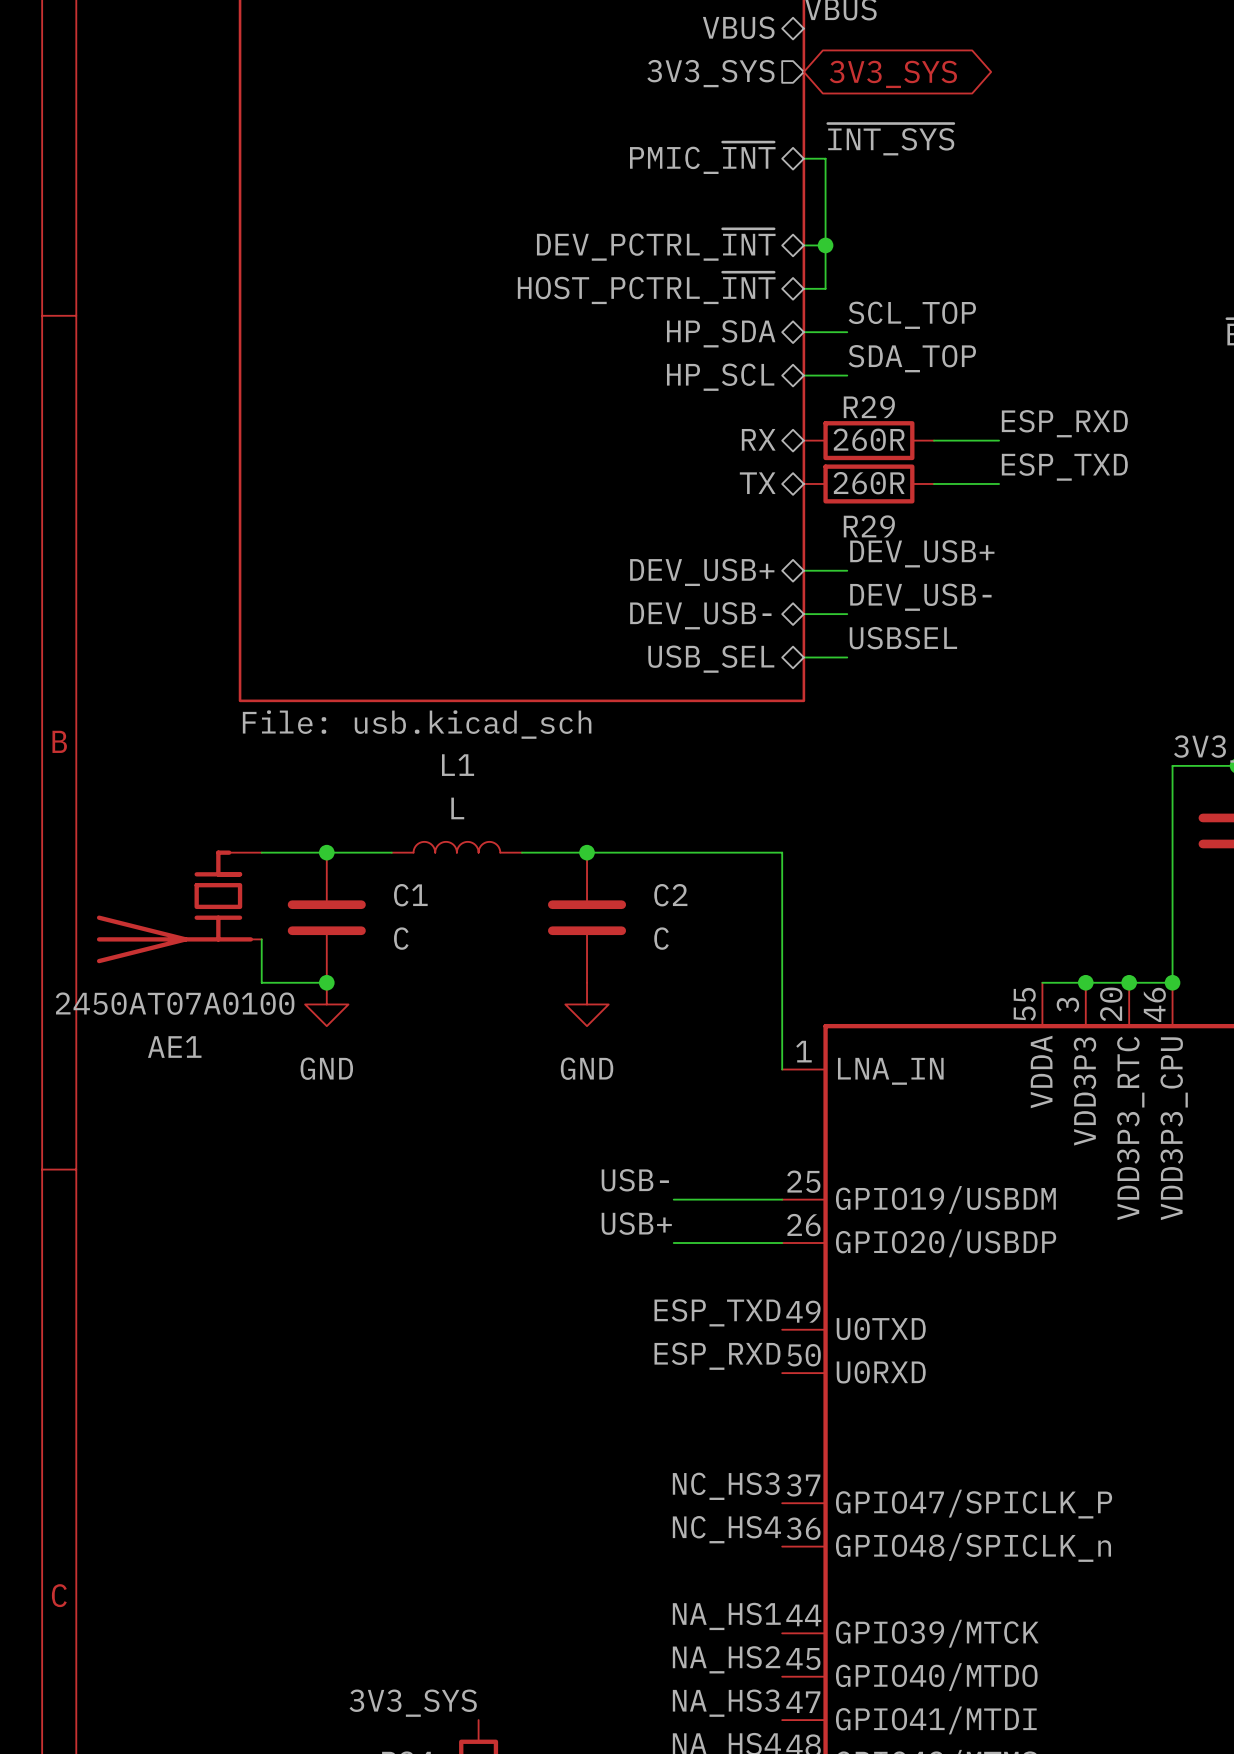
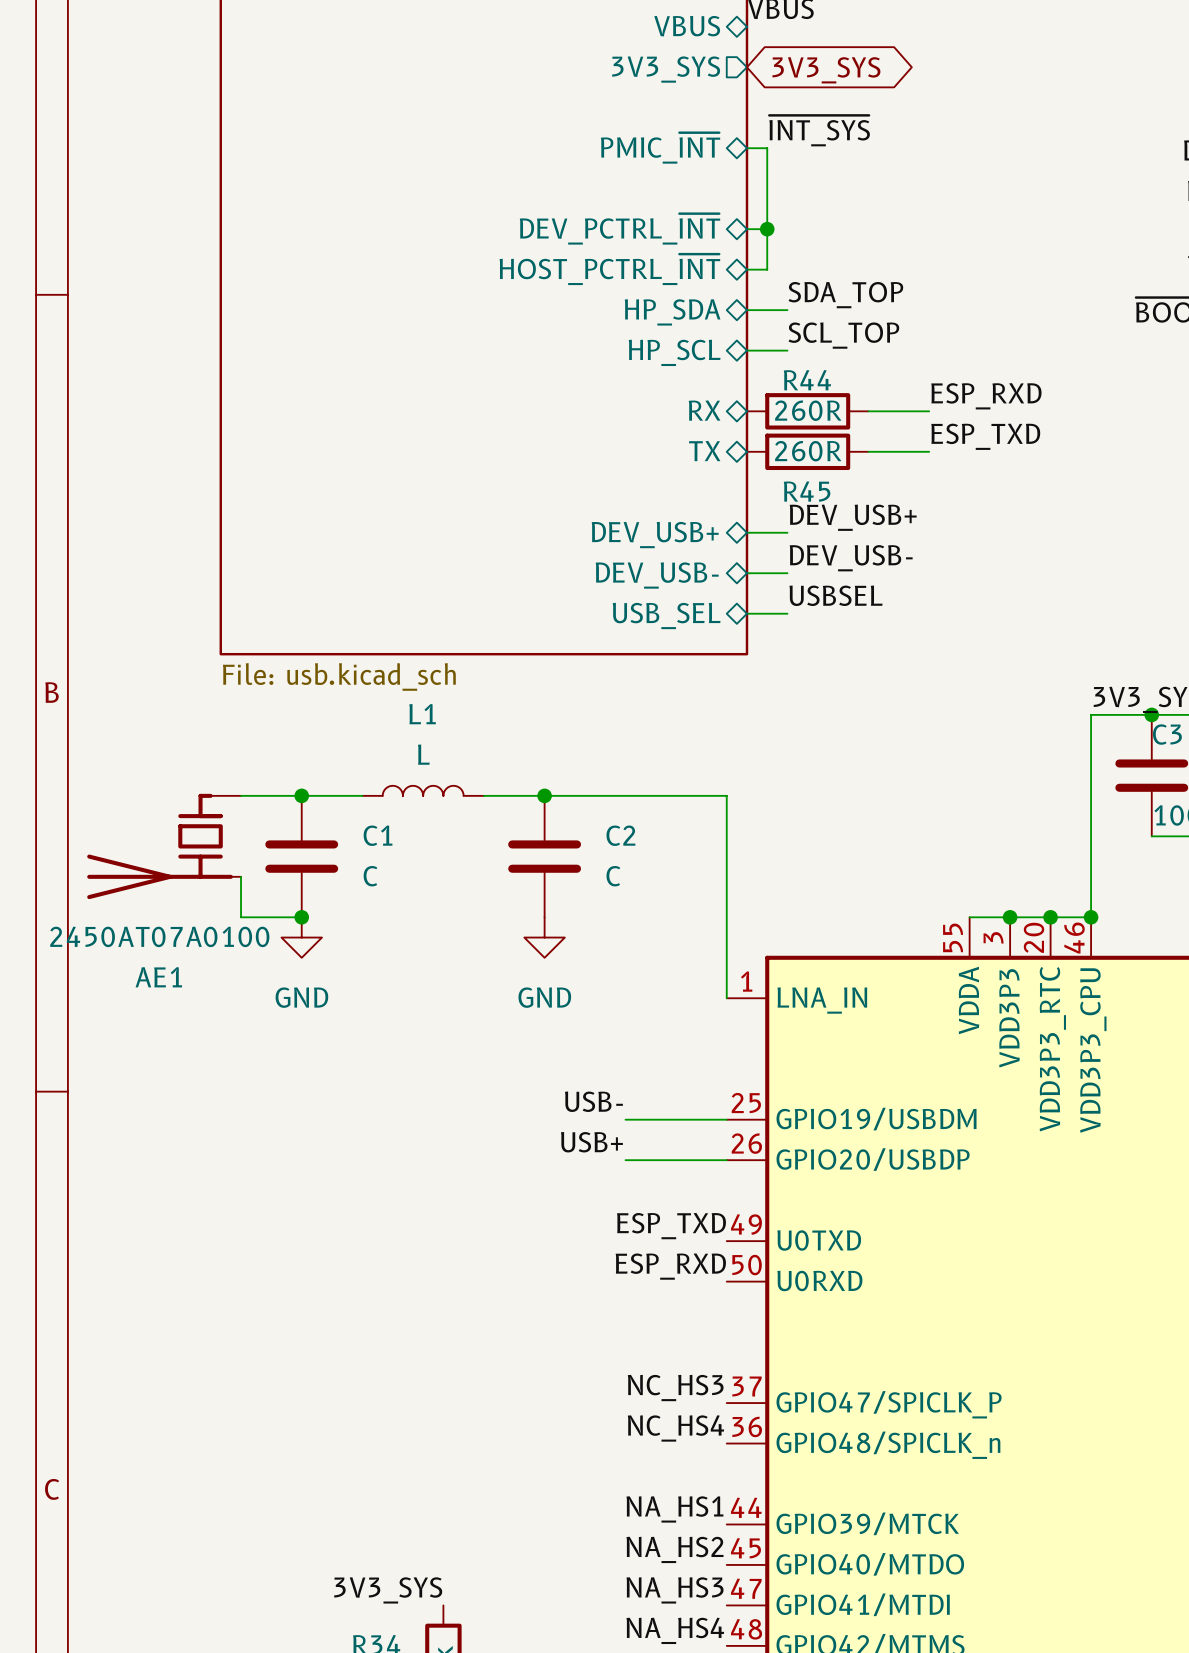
label: SCL_TOP (912, 315) -> SDA_TOP (845, 295)
label: SDA_TOP (912, 358) -> SCL_TOP (843, 335)
R29 name: R29 (869, 407) -> R44 (807, 380)
R29 name: R29 (869, 526) -> R45 (807, 491)

